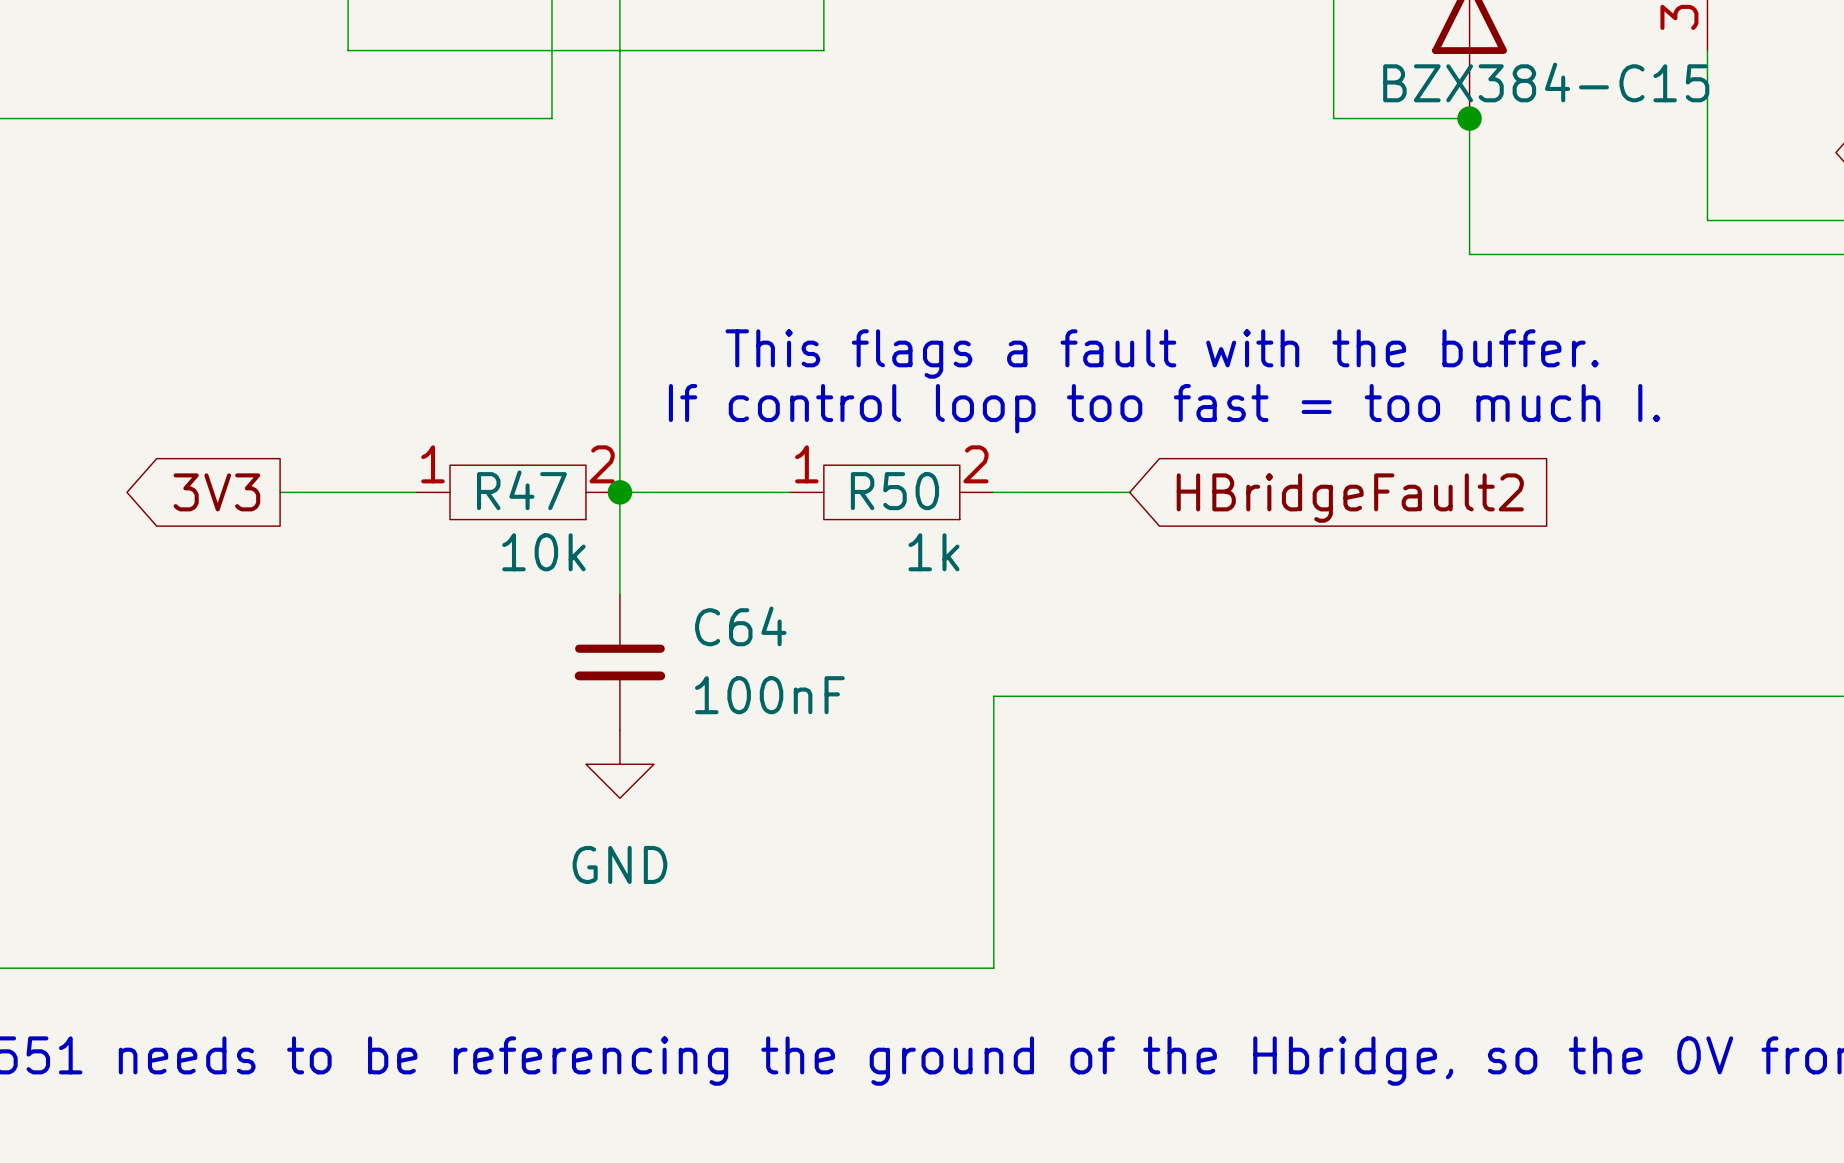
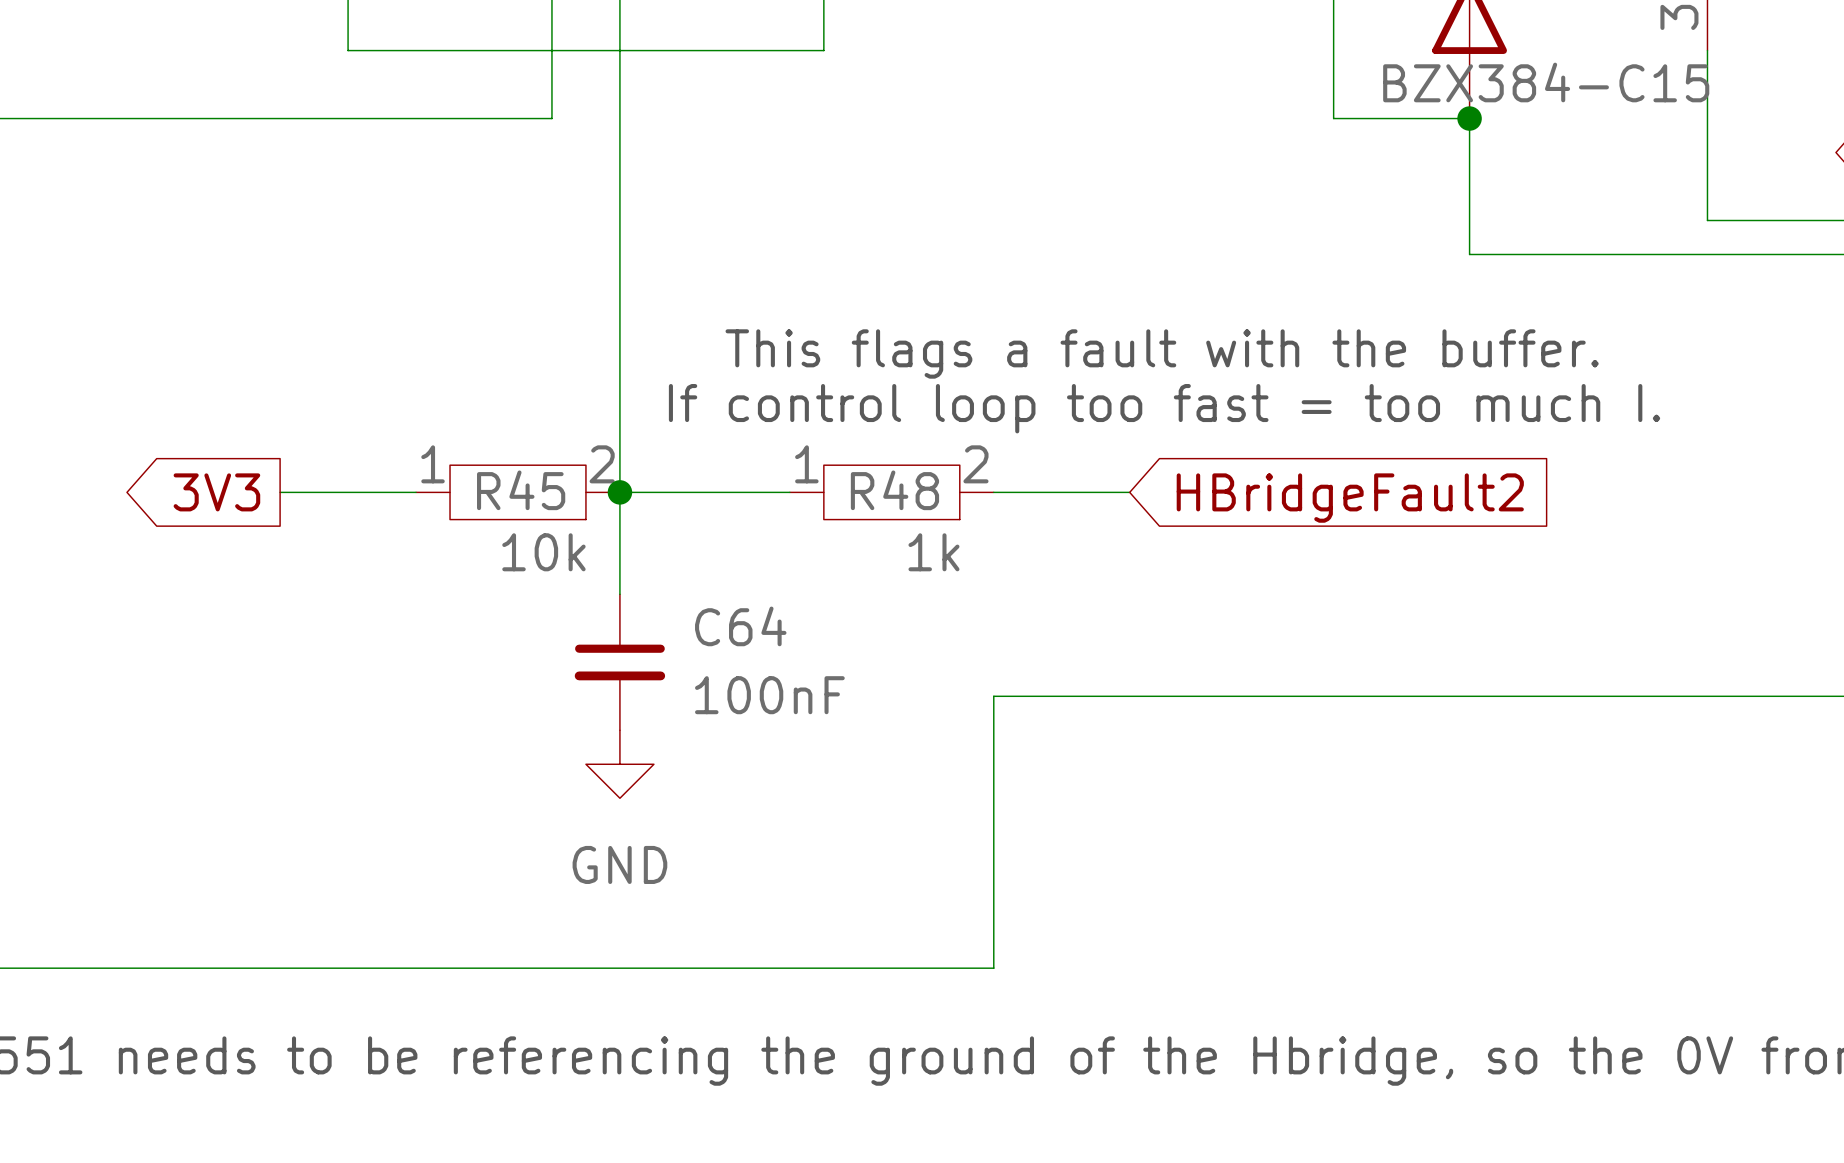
R47 name: R47 (521, 490) -> R45 (521, 490)
R50 name: R50 (894, 491) -> R48 (894, 490)

